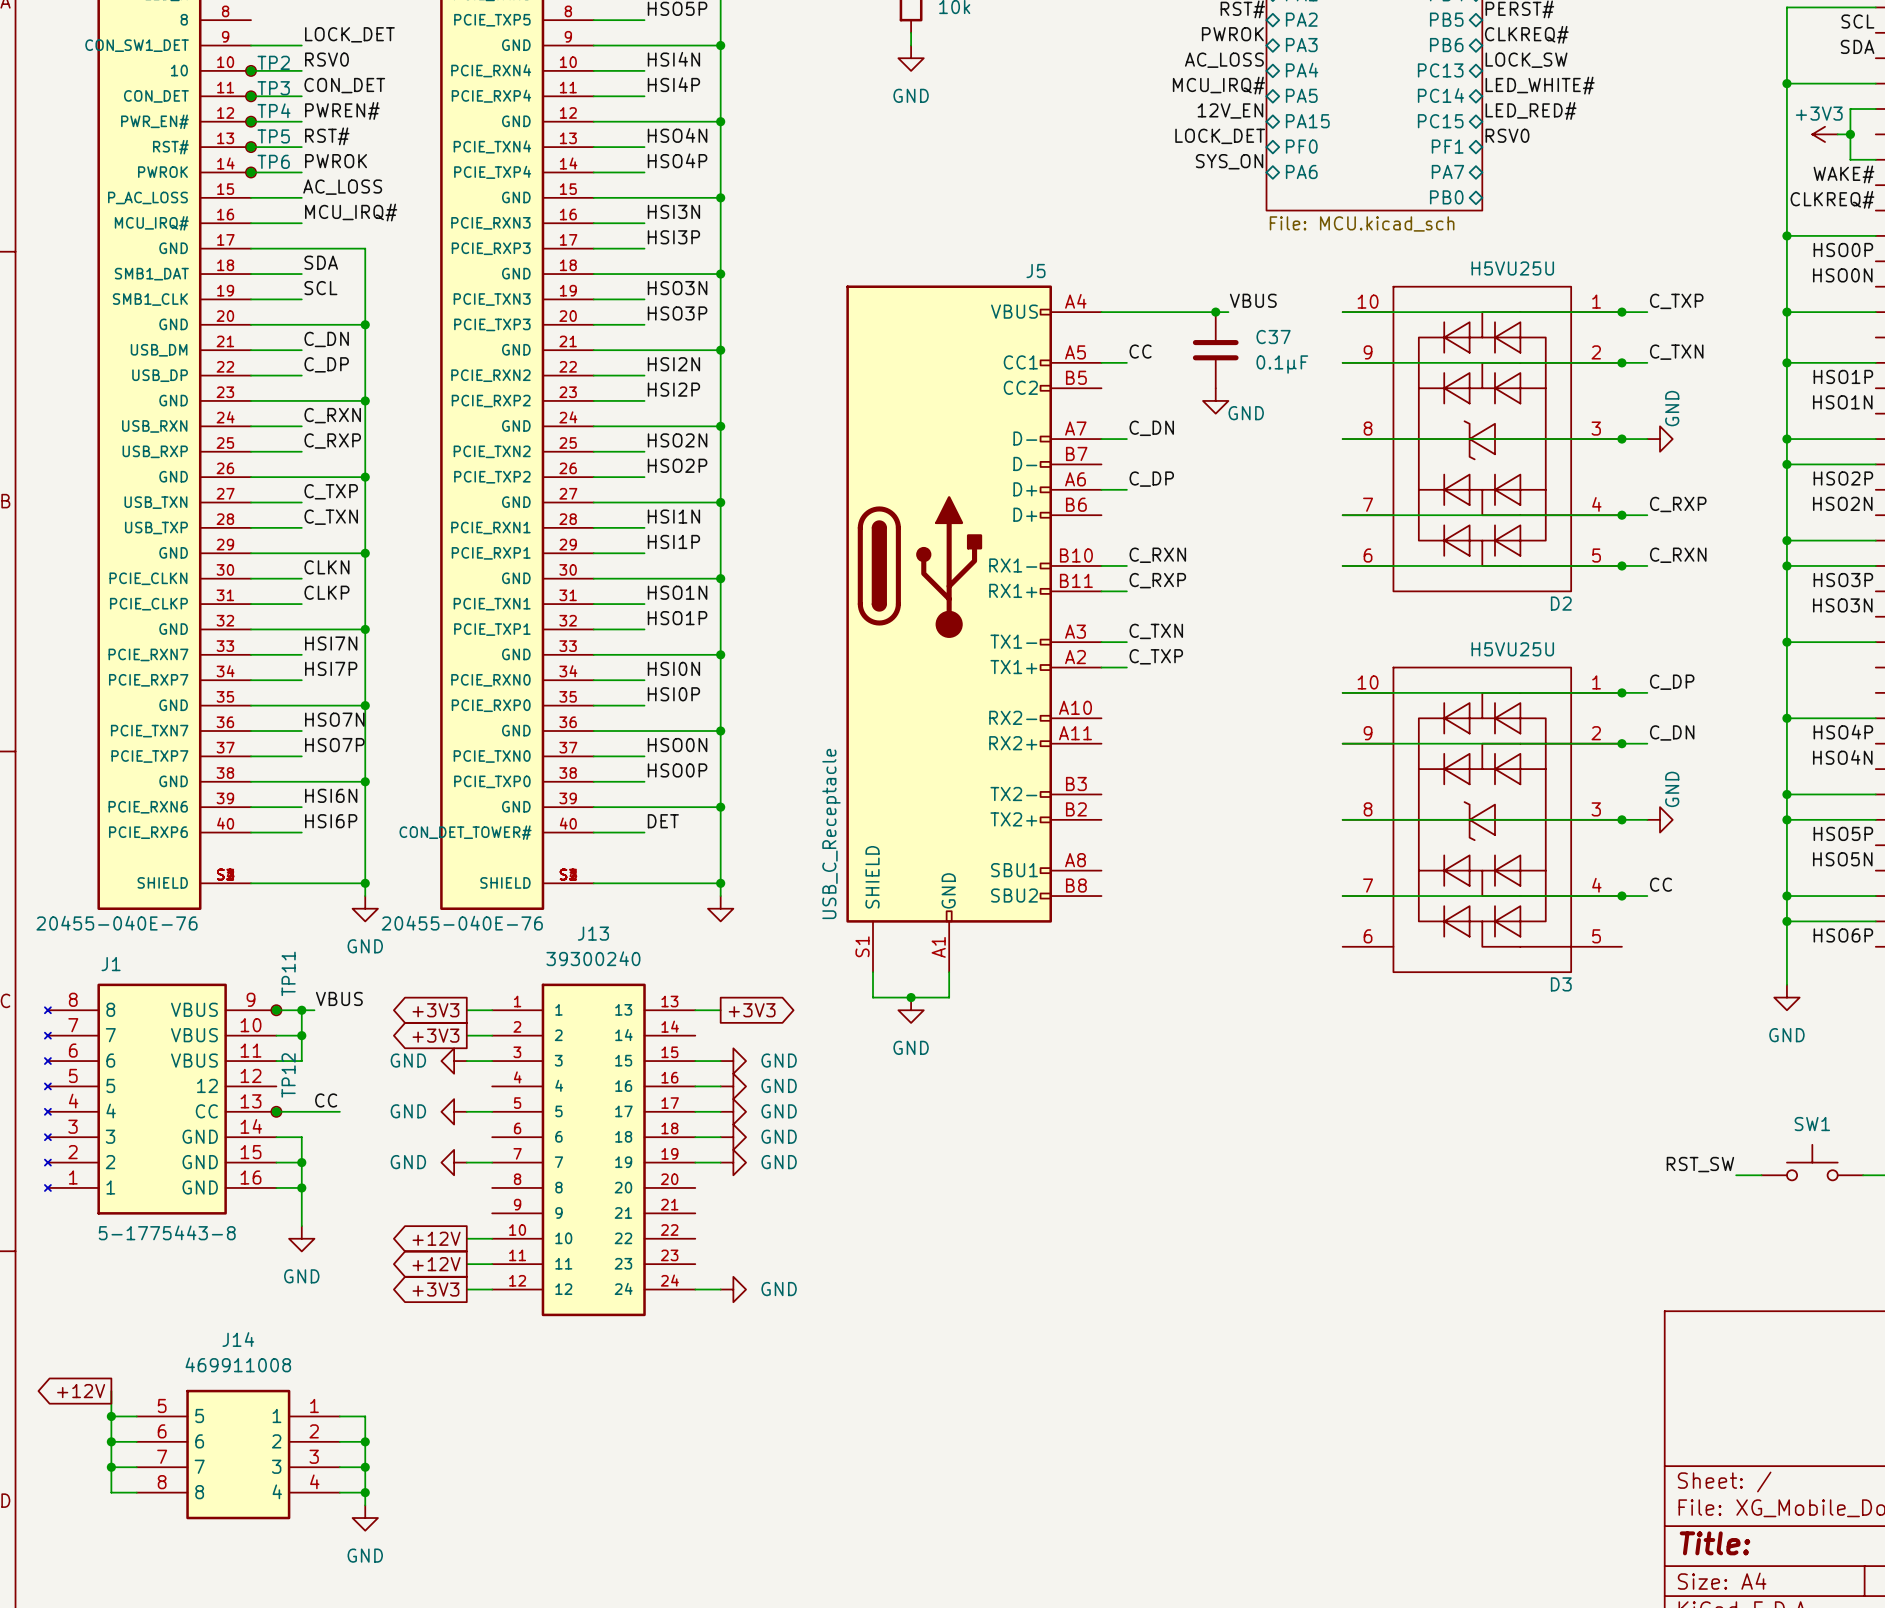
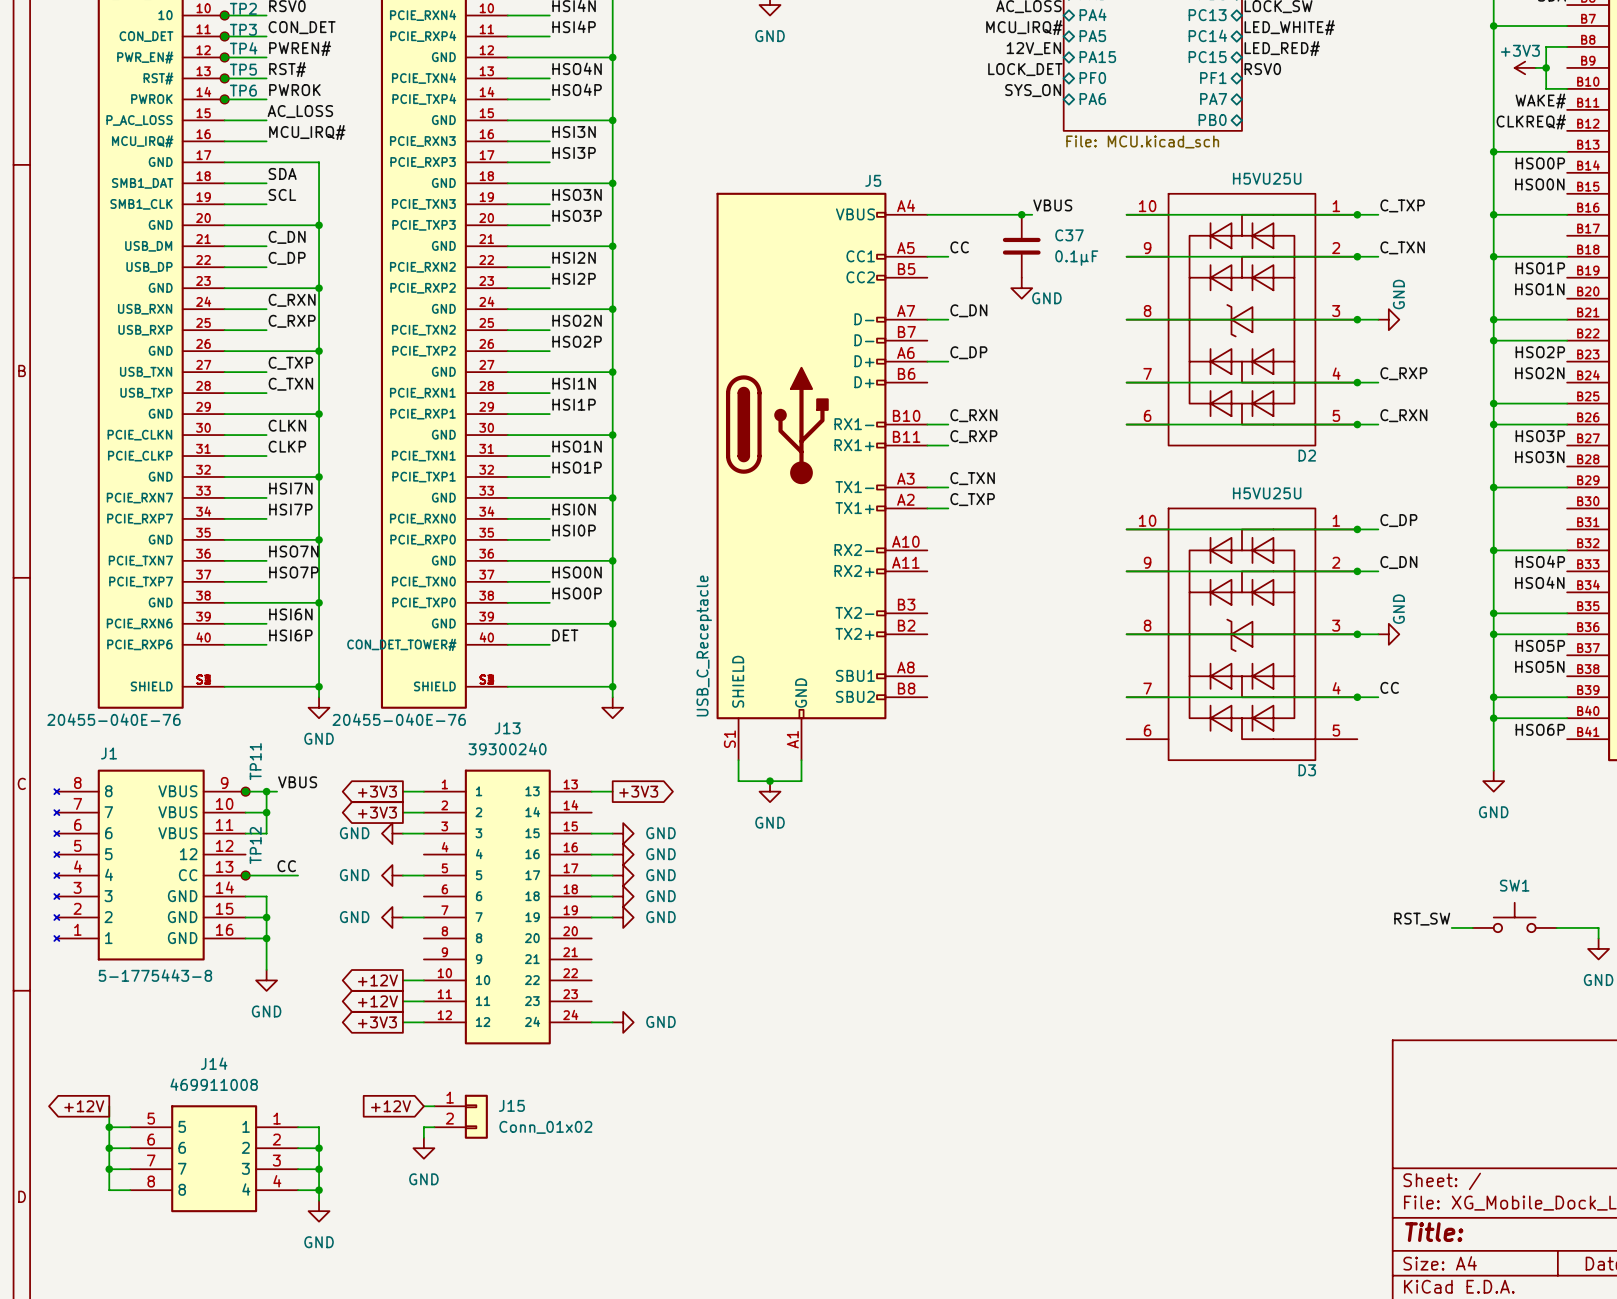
global label: none -> +12V (391, 1106)
wire: none -> (423, 1106) (434, 1106)
J15: none -> Conn_01x02 (461, 1116)
wire: none -> (434, 1127) (423, 1127) (423, 1137)
power symbol: none -> GND (423, 1148)

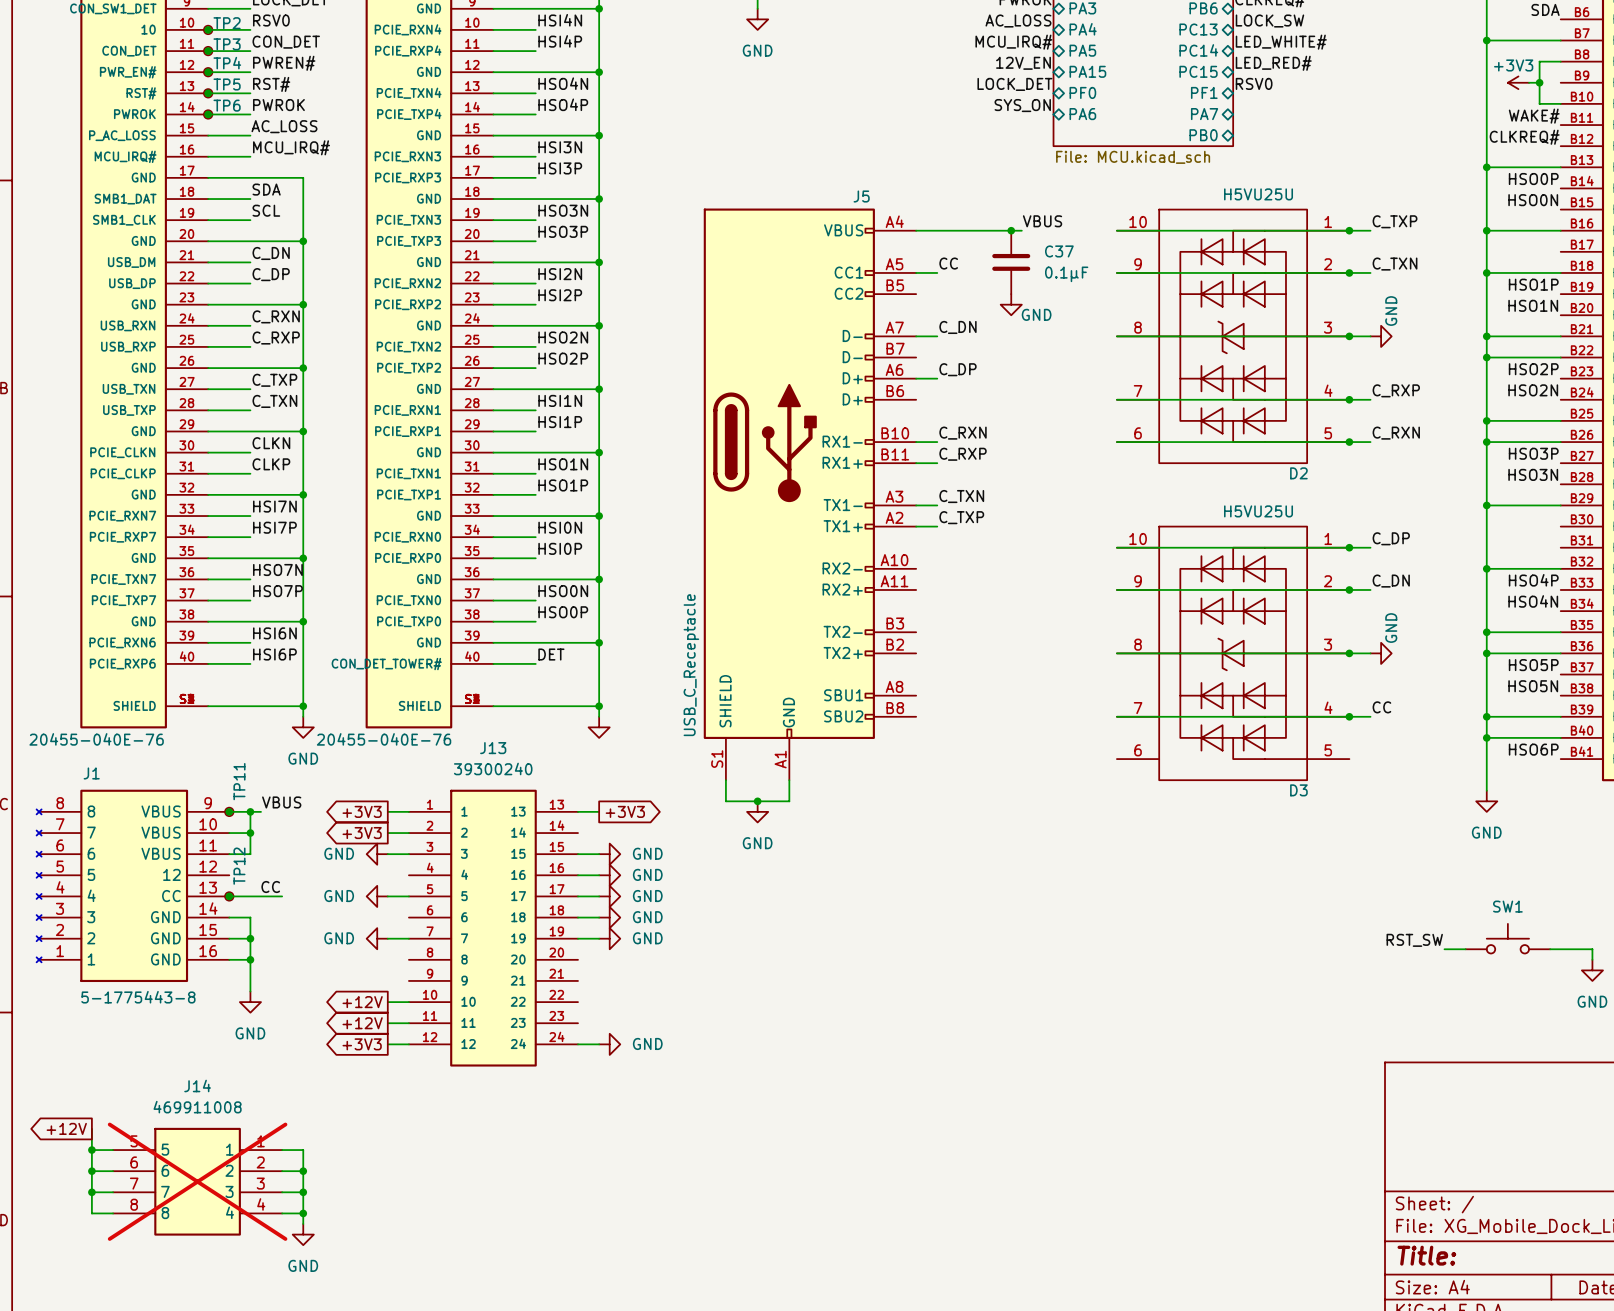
global label: +12V (391, 1106) -> none
wire: (423, 1106) (434, 1106) -> none
J15: Conn_01x02 (461, 1116) -> none
wire: (434, 1127) (423, 1127) (423, 1137) -> none
power symbol: GND (423, 1148) -> none
J14 do-not-place cross: none -> (197, 1181)

